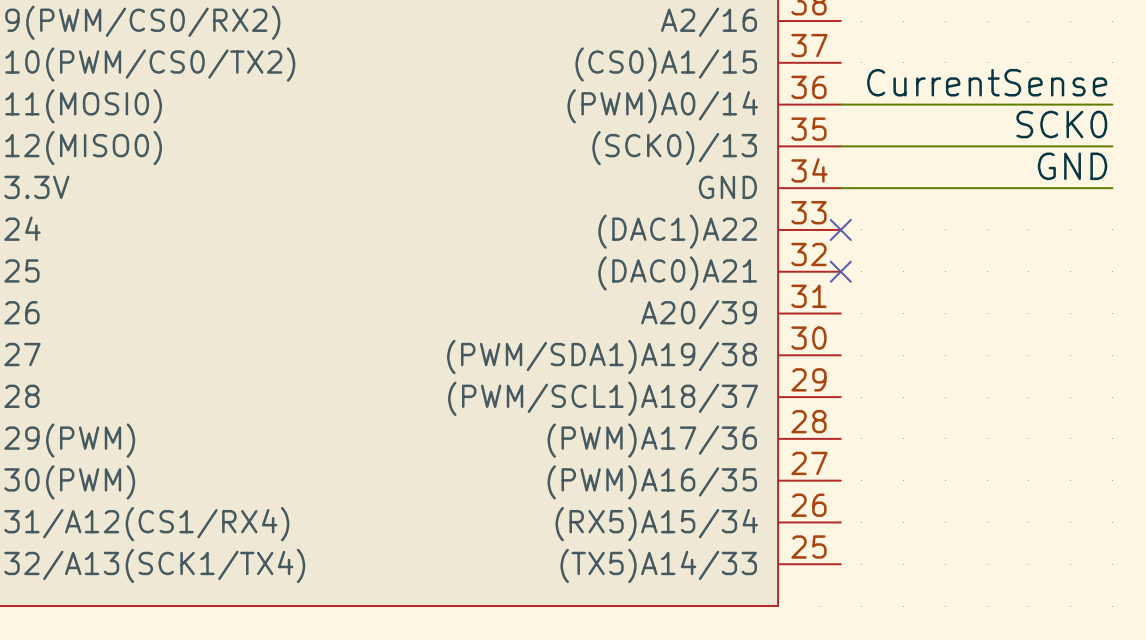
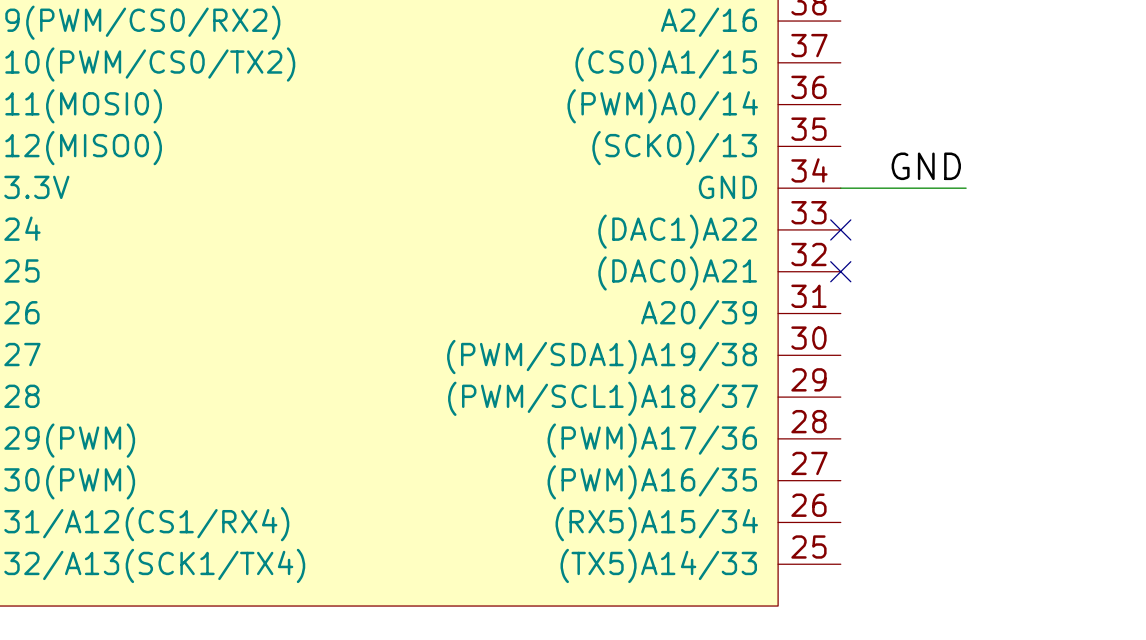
label: CurrentSense (987, 82) -> none
wire: (840, 104) (1112, 104) -> none
label: SCK0 (1061, 124) -> none
wire: (840, 146) (1112, 146) -> none
label position: GND (1072, 166) -> GND (926, 166)
wire: (966, 188) (1112, 188) -> none

